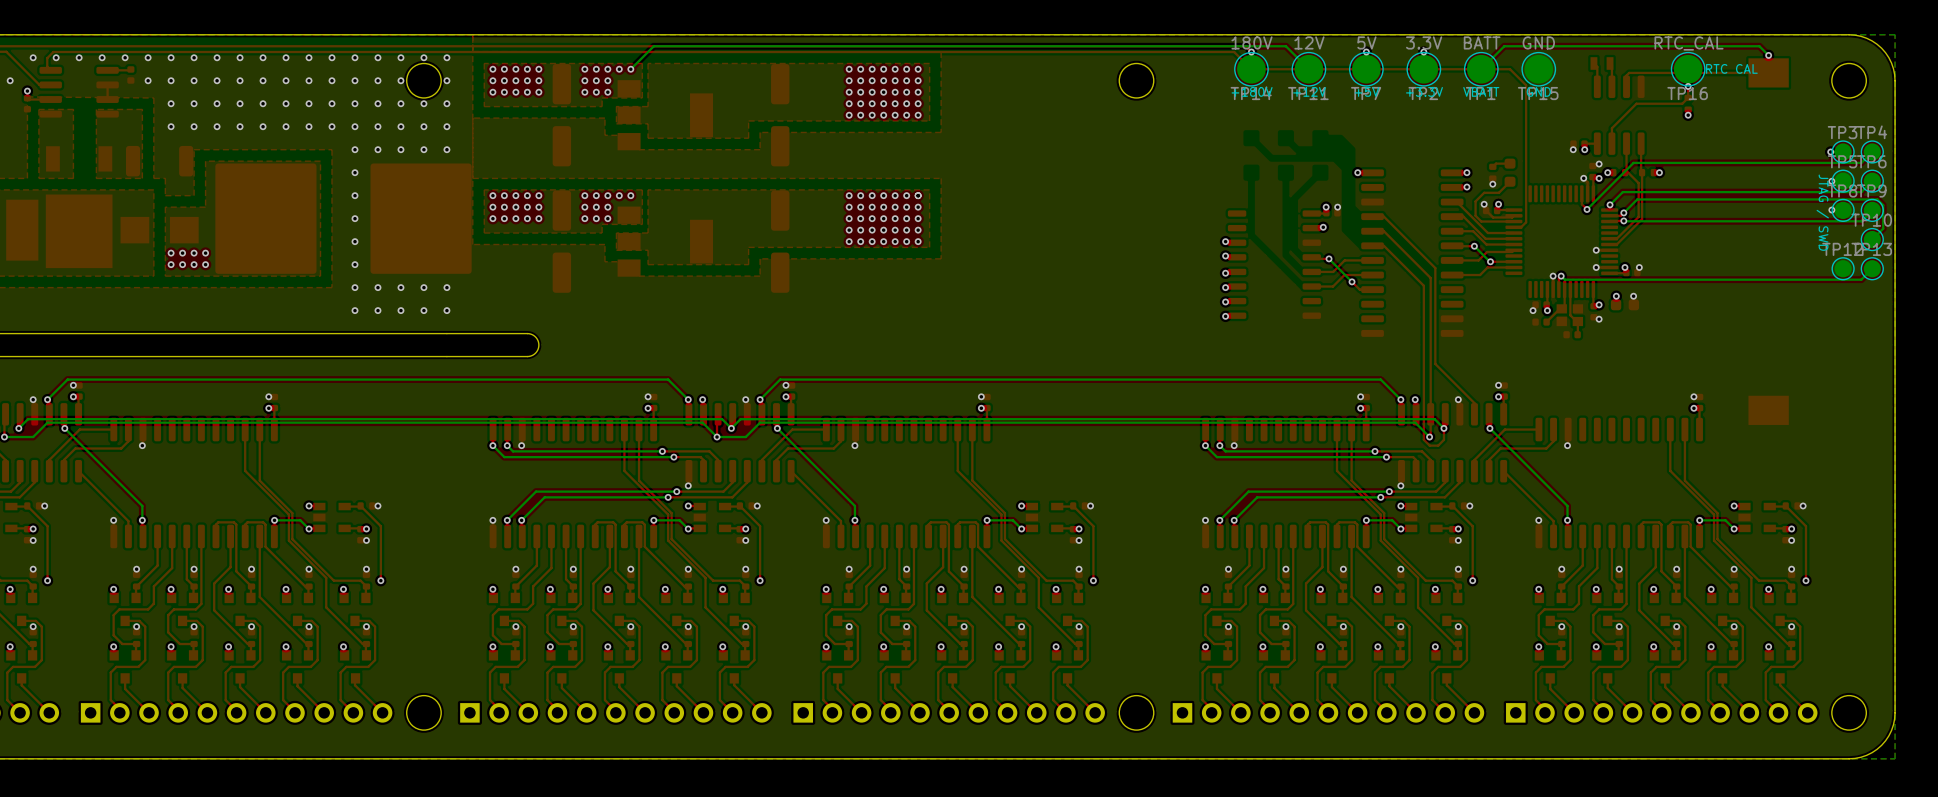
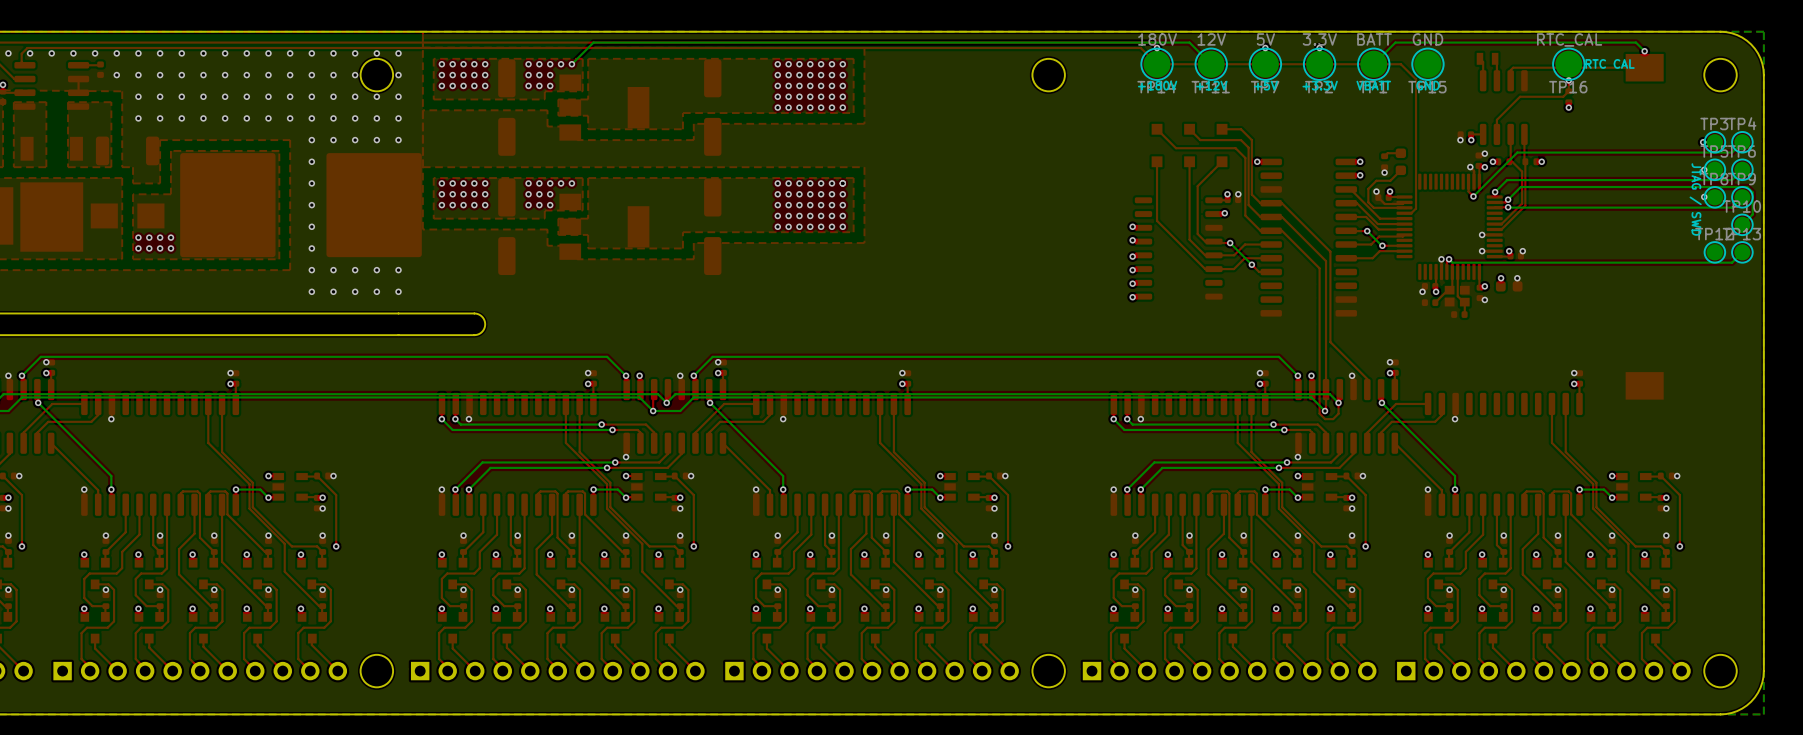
top track: none -> (1157, 129) (1176, 148) (1235, 148) (1245, 157) (1245, 215) (1260, 230) (1271, 230)
part: none -> (1157, 129)
top track: none -> (1189, 129) (1200, 140) (1241, 140) (1248, 147) (1248, 205) (1260, 216) (1271, 216)
part: none -> (1189, 129)
top track: none -> (1222, 129) (1241, 129) (1251, 140) (1251, 194) (1260, 203) (1271, 203)
part: none -> (1222, 129)
top track: none -> (1157, 161) (1157, 220) (1205, 269) (1213, 269)
part: none -> (1157, 161)
top track: none -> (1189, 161) (1189, 239) (1205, 255) (1213, 255)
part: none -> (1189, 161)
top track: none -> (1222, 161) (1197, 186) (1197, 233) (1205, 241) (1213, 241)
part: none -> (1222, 161)

